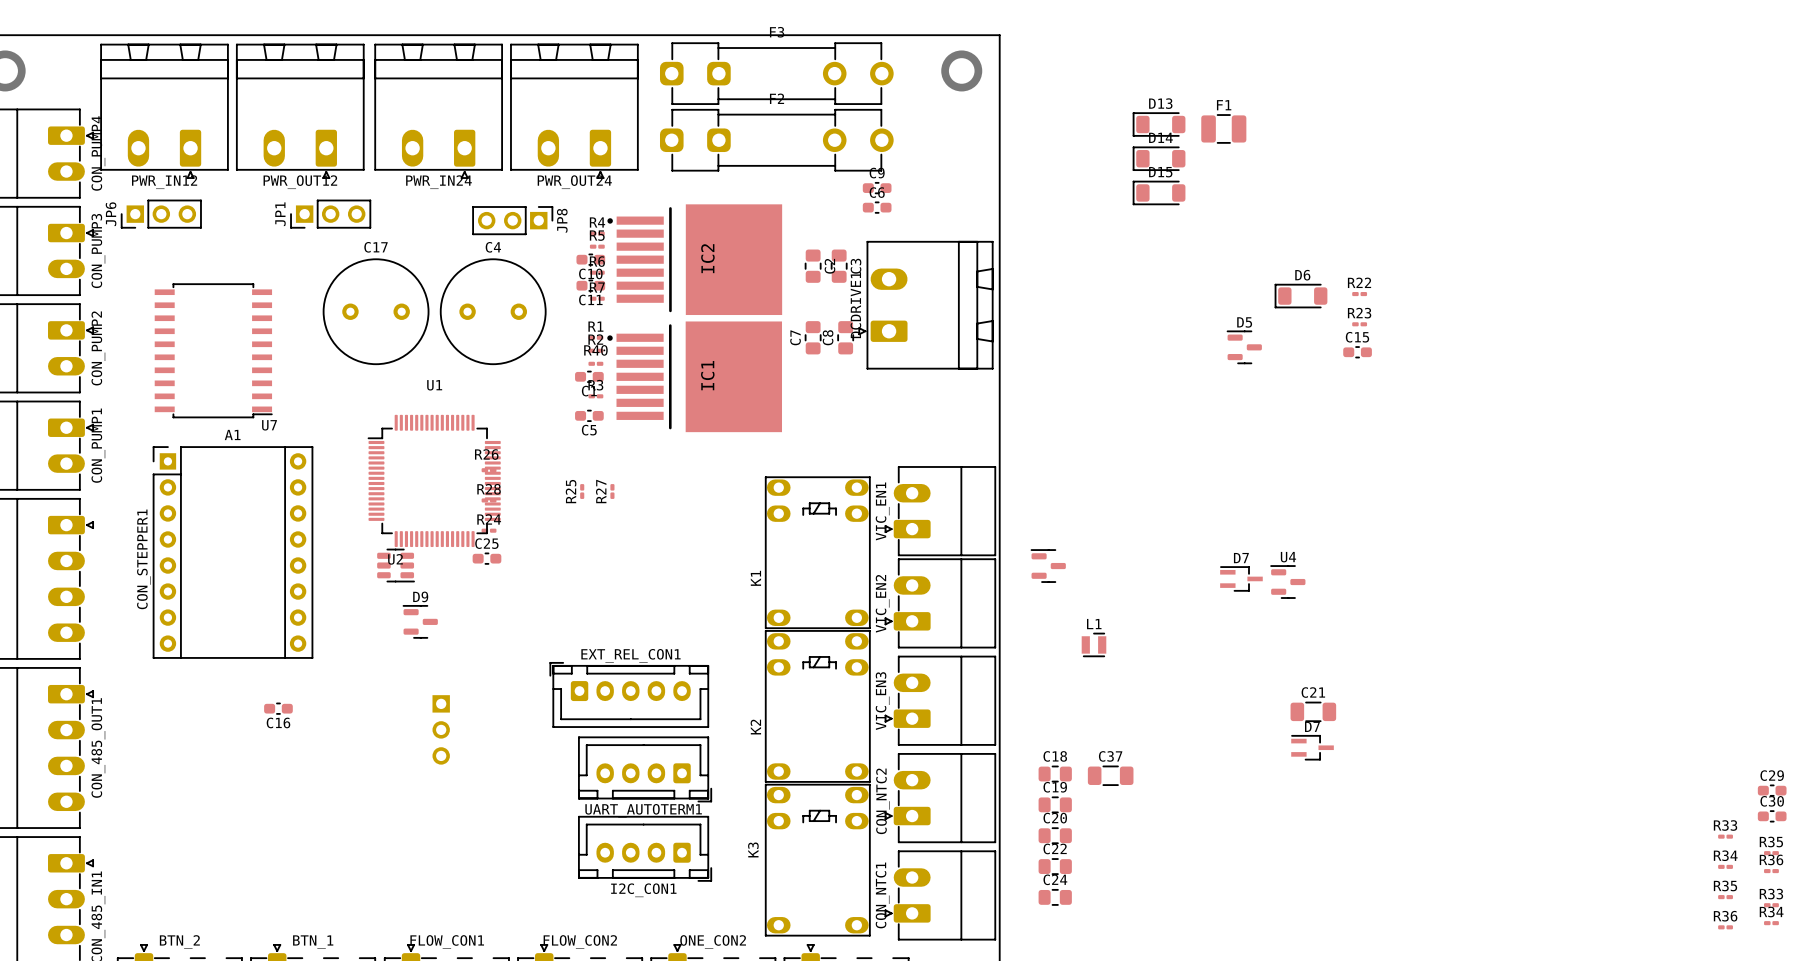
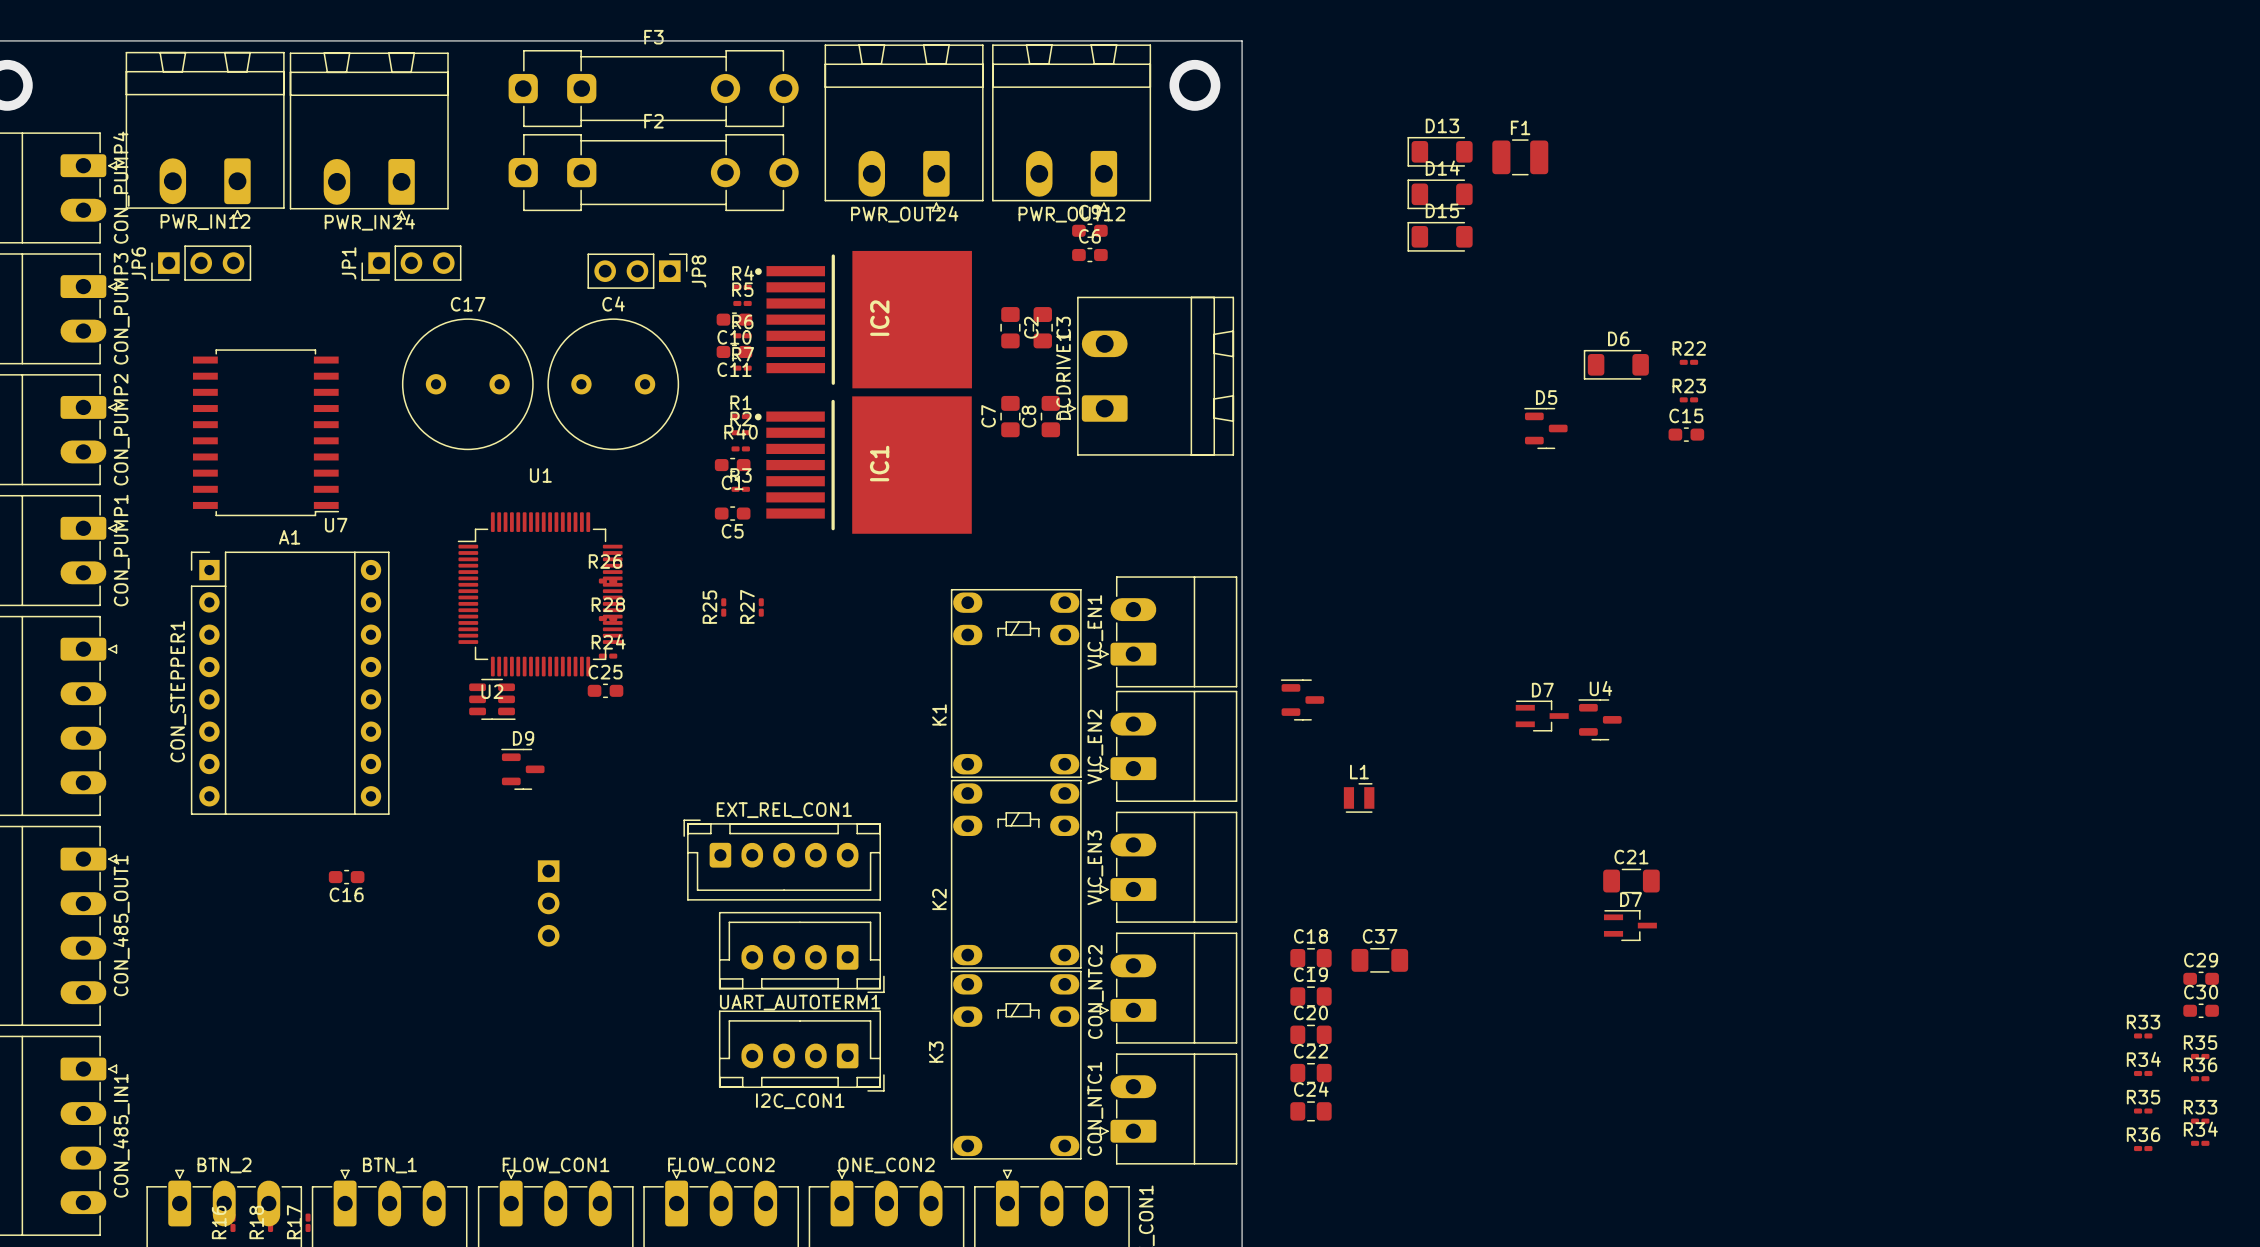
F3 position: (776, 73) -> (653, 88)
PWR_OUT12 position: (300, 111) -> (1071, 128)
PWR_IN24 position: (438, 111) -> (369, 136)
PWR_OUT24 position: (574, 111) -> (904, 128)
F2 position: (776, 140) -> (653, 172)

